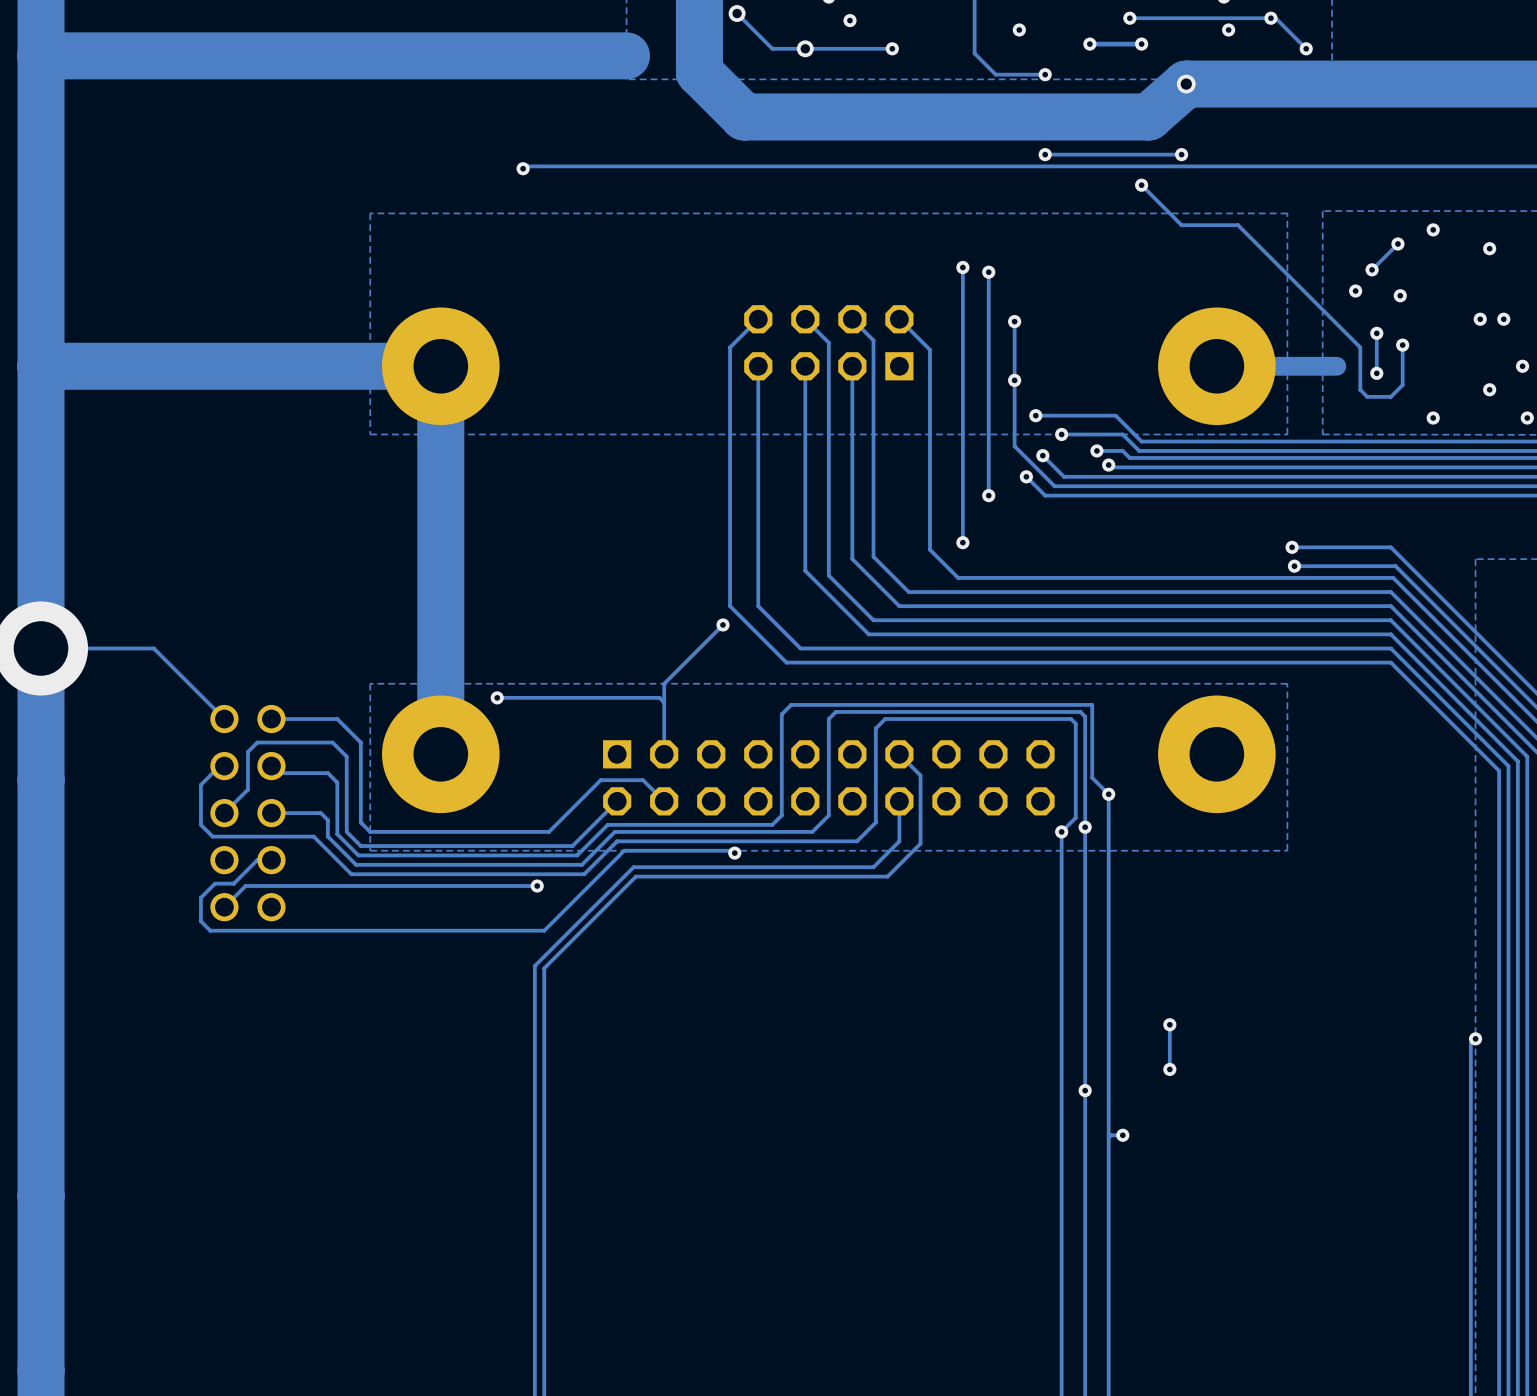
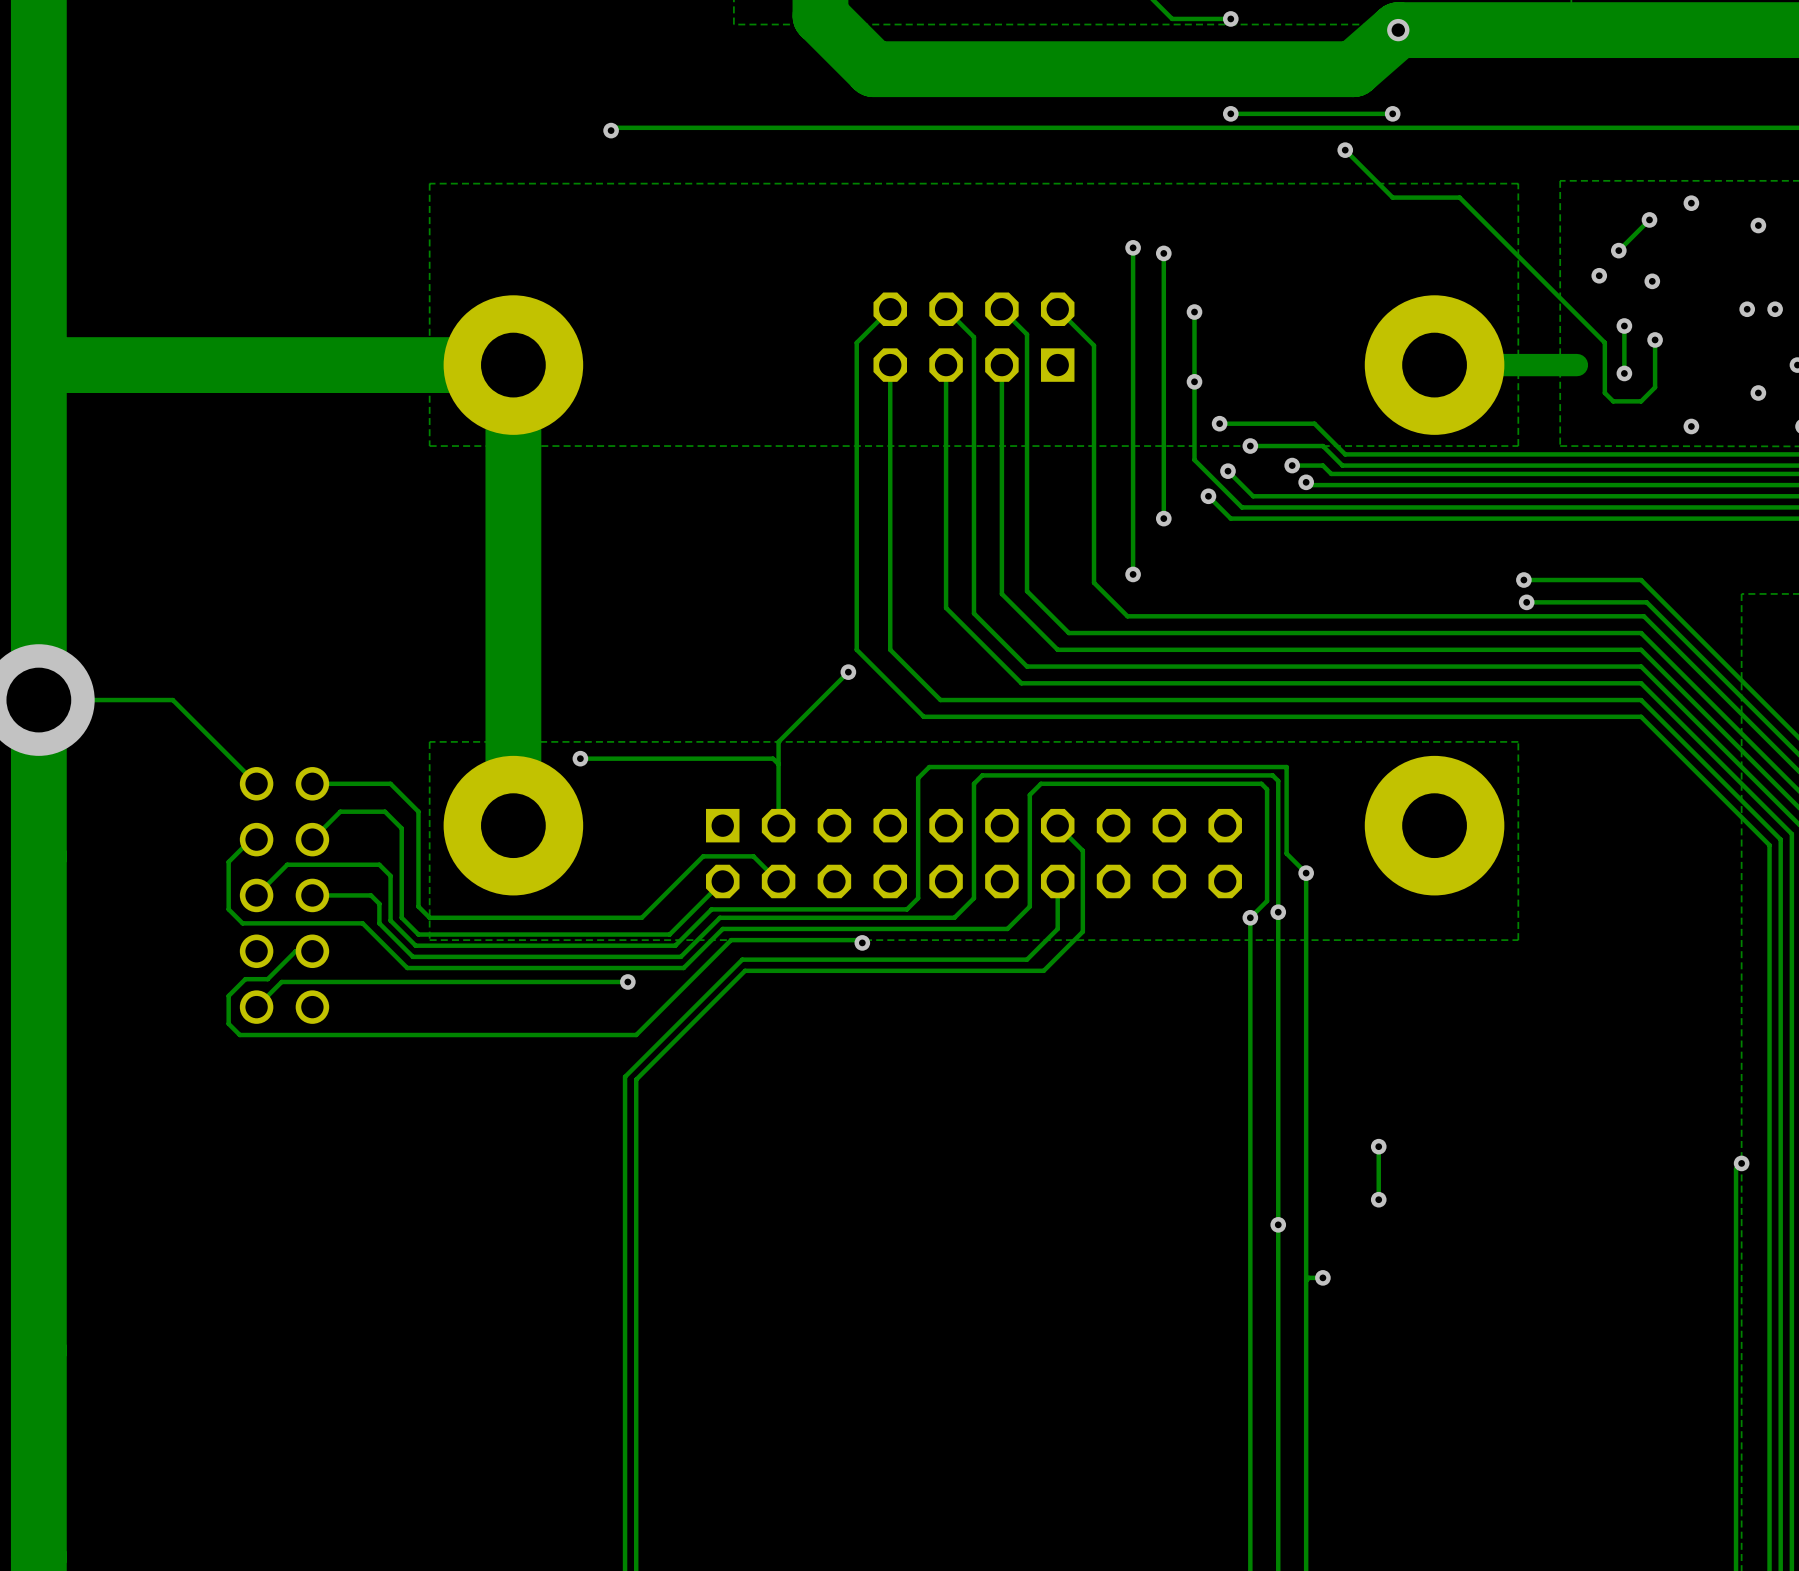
track: (294, 742) (257, 742) (247, 751) (247, 789) -> (340, 811) (312, 839)
track: (271, 766) (278, 773) (327, 773) (337, 782) (337, 796) -> (284, 867) (287, 864) (379, 864) (390, 875)

